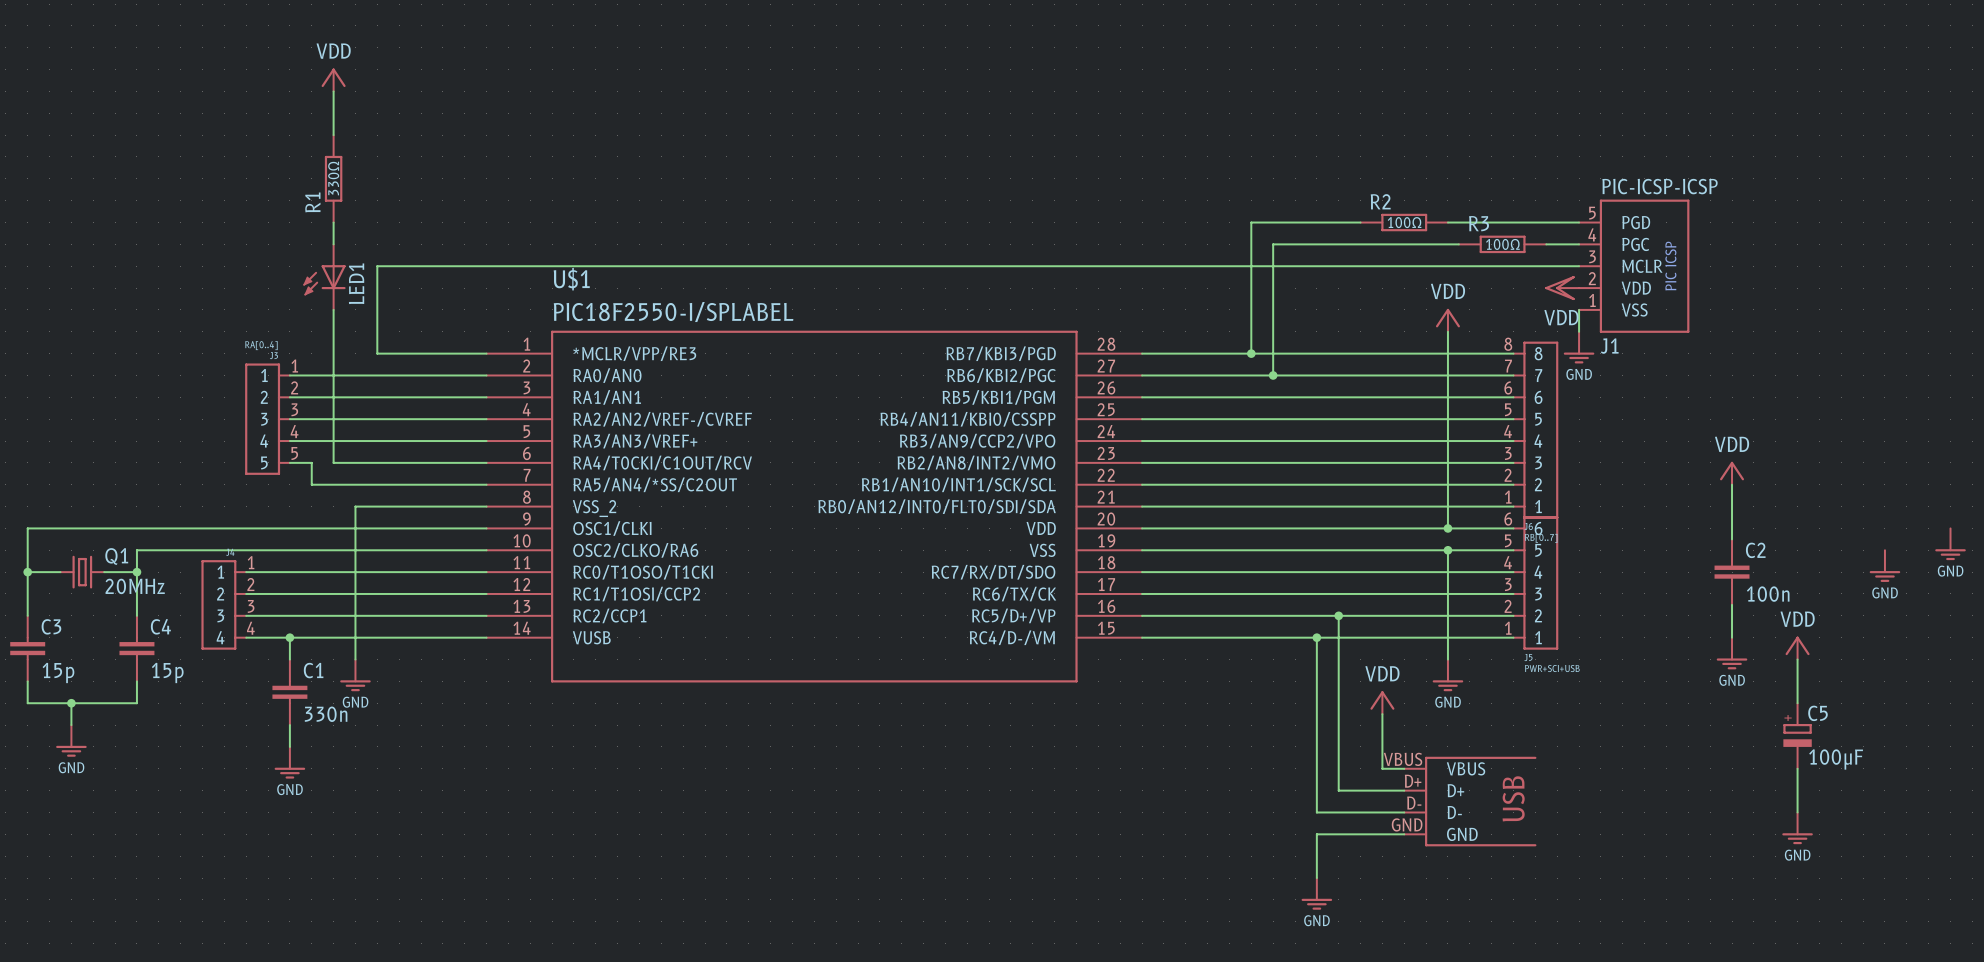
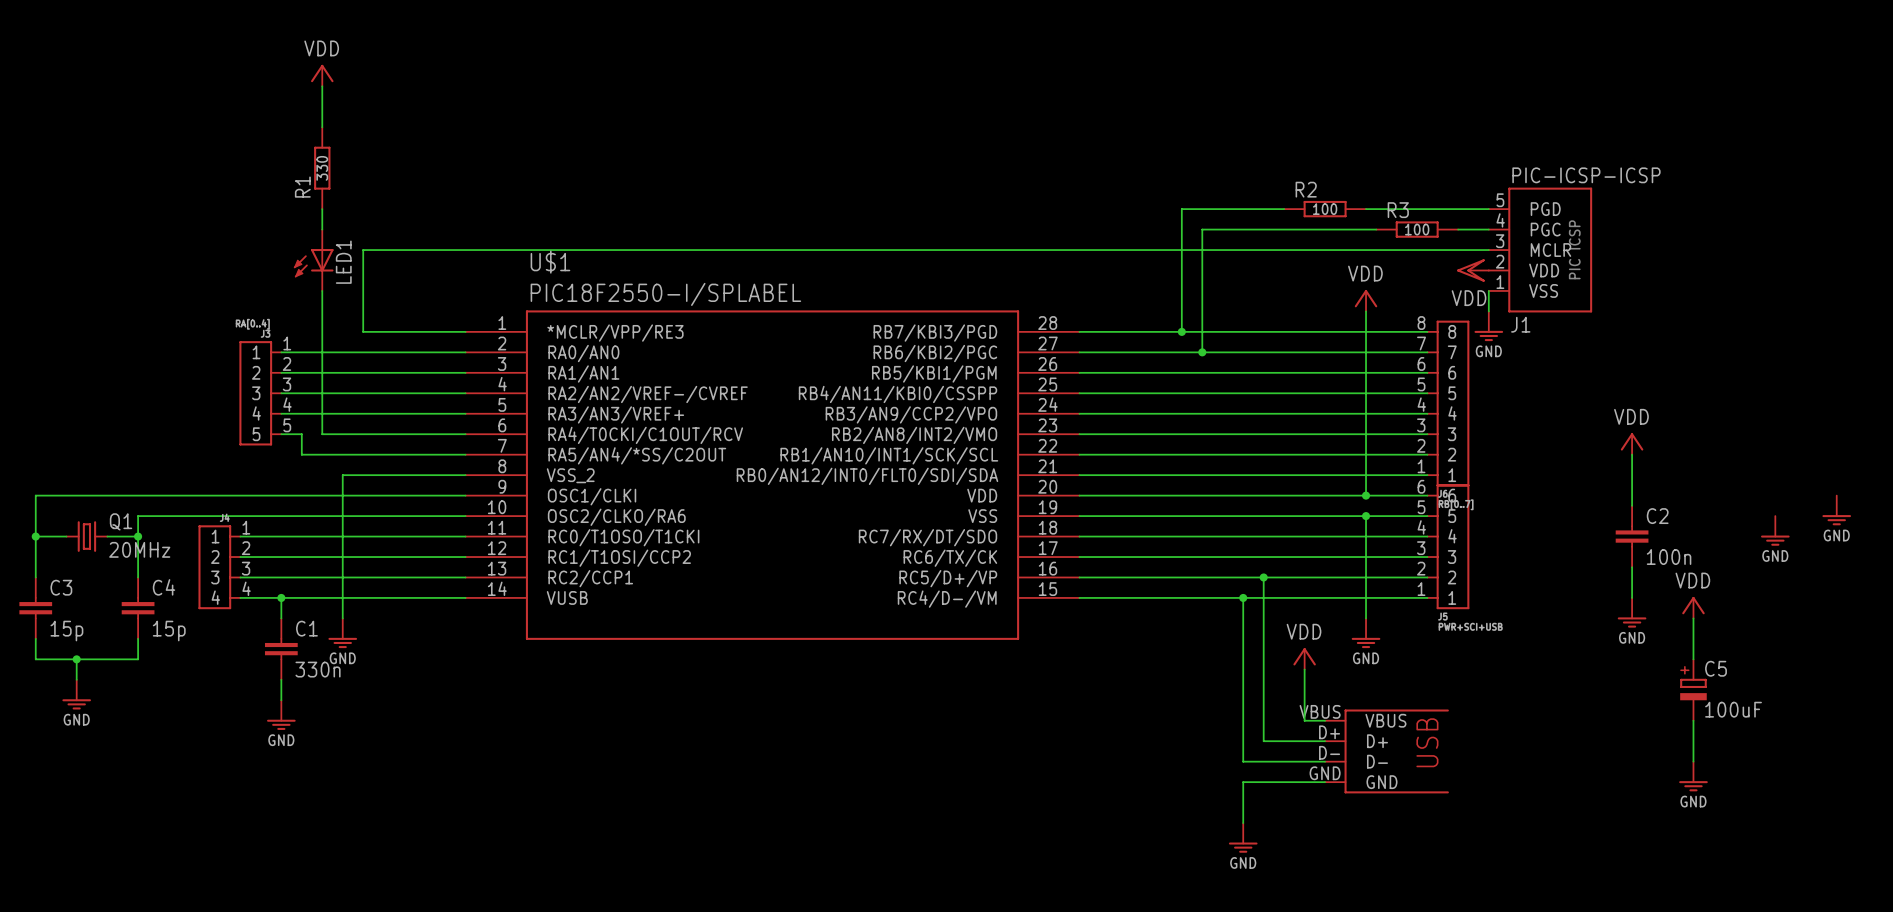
R1 value: 330Ω (333, 178) -> 330 (322, 168)
R2 value: 100Ω (1404, 222) -> 100 (1325, 209)
R3 value: 100Ω (1502, 244) -> 100 (1417, 229)
C5 value: 100μF (1836, 759) -> 100uF (1733, 709)

